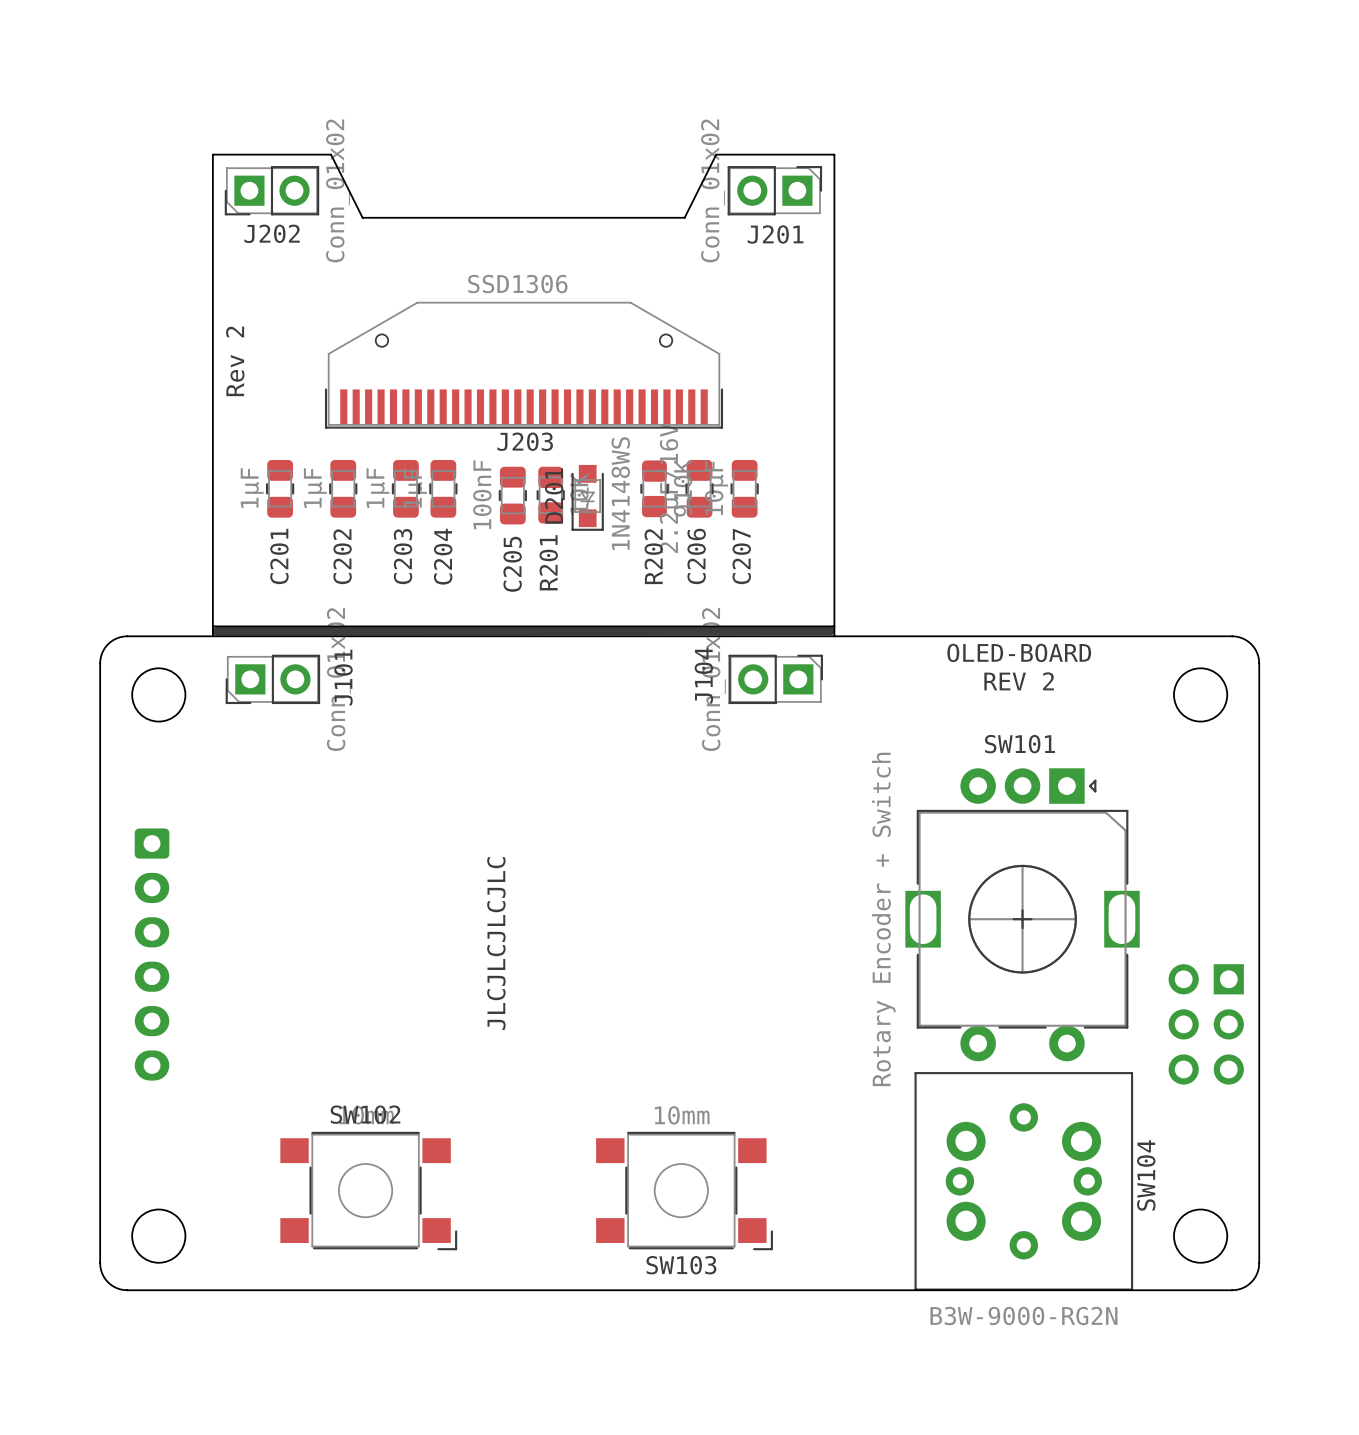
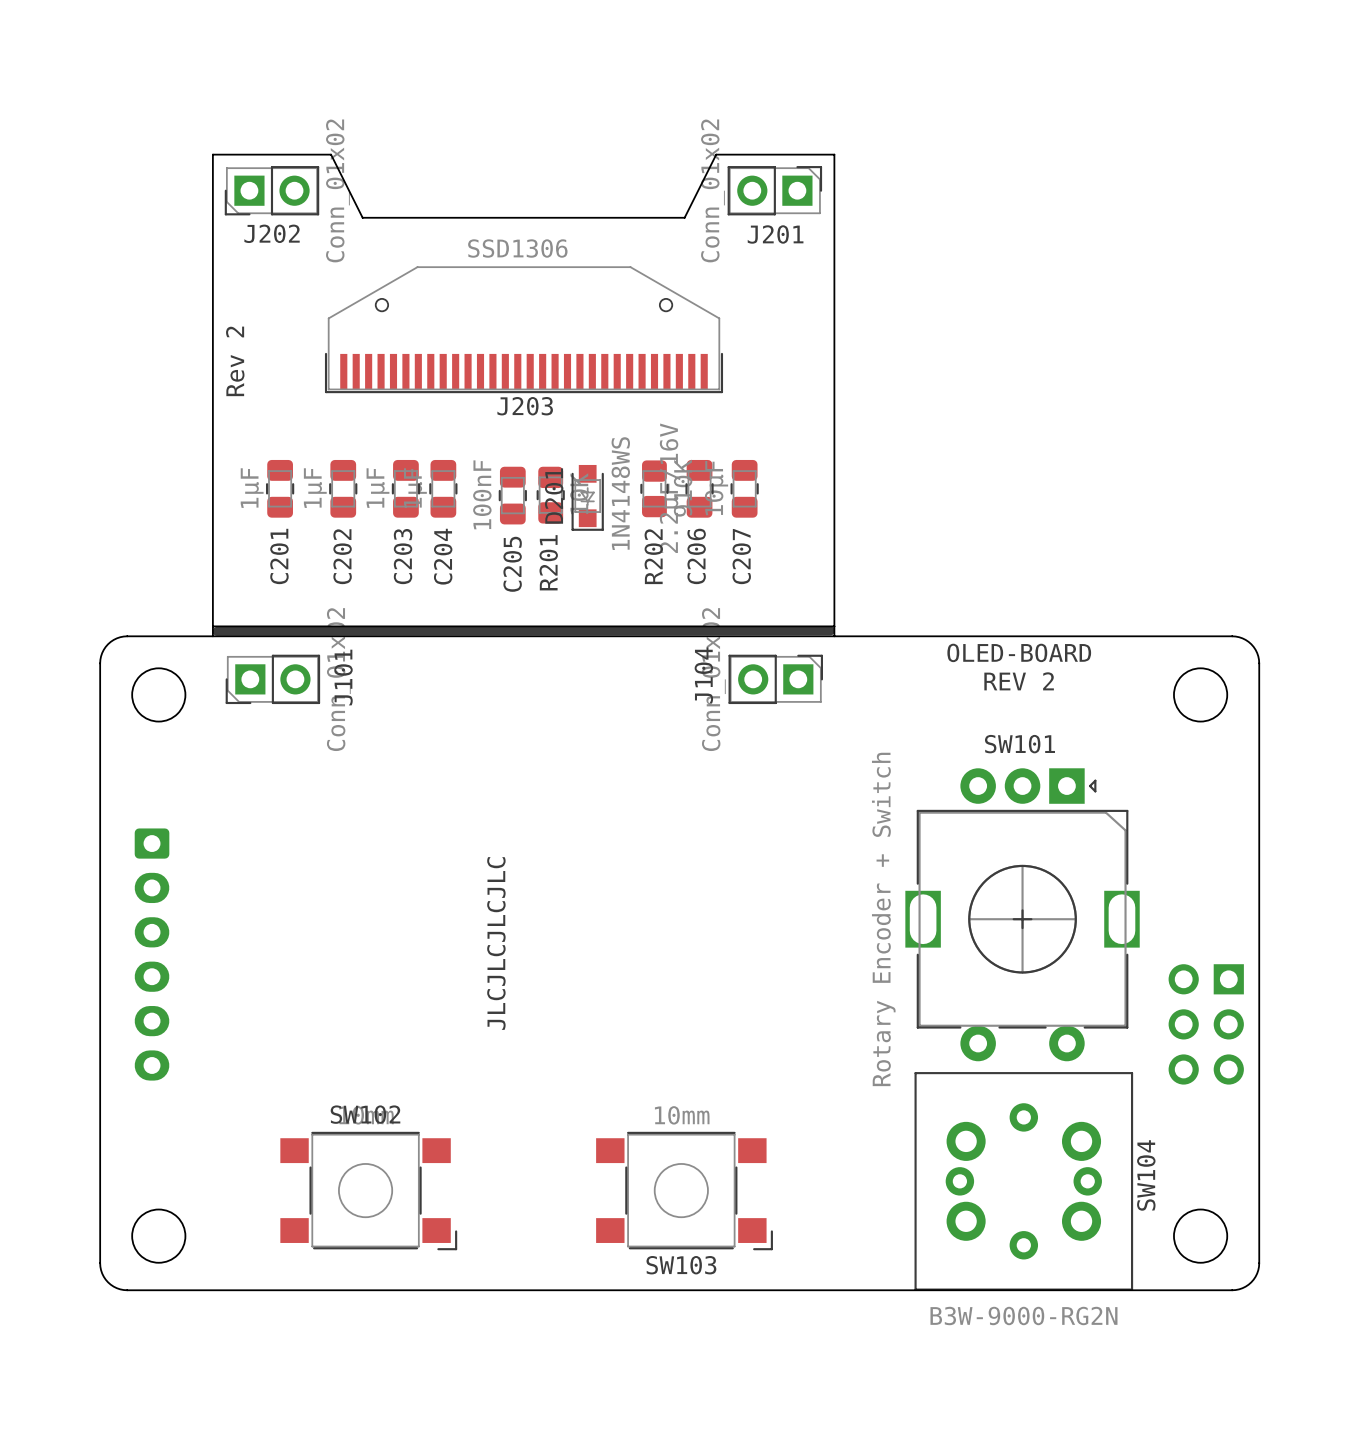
J203 position: (524, 365) -> (524, 329)

